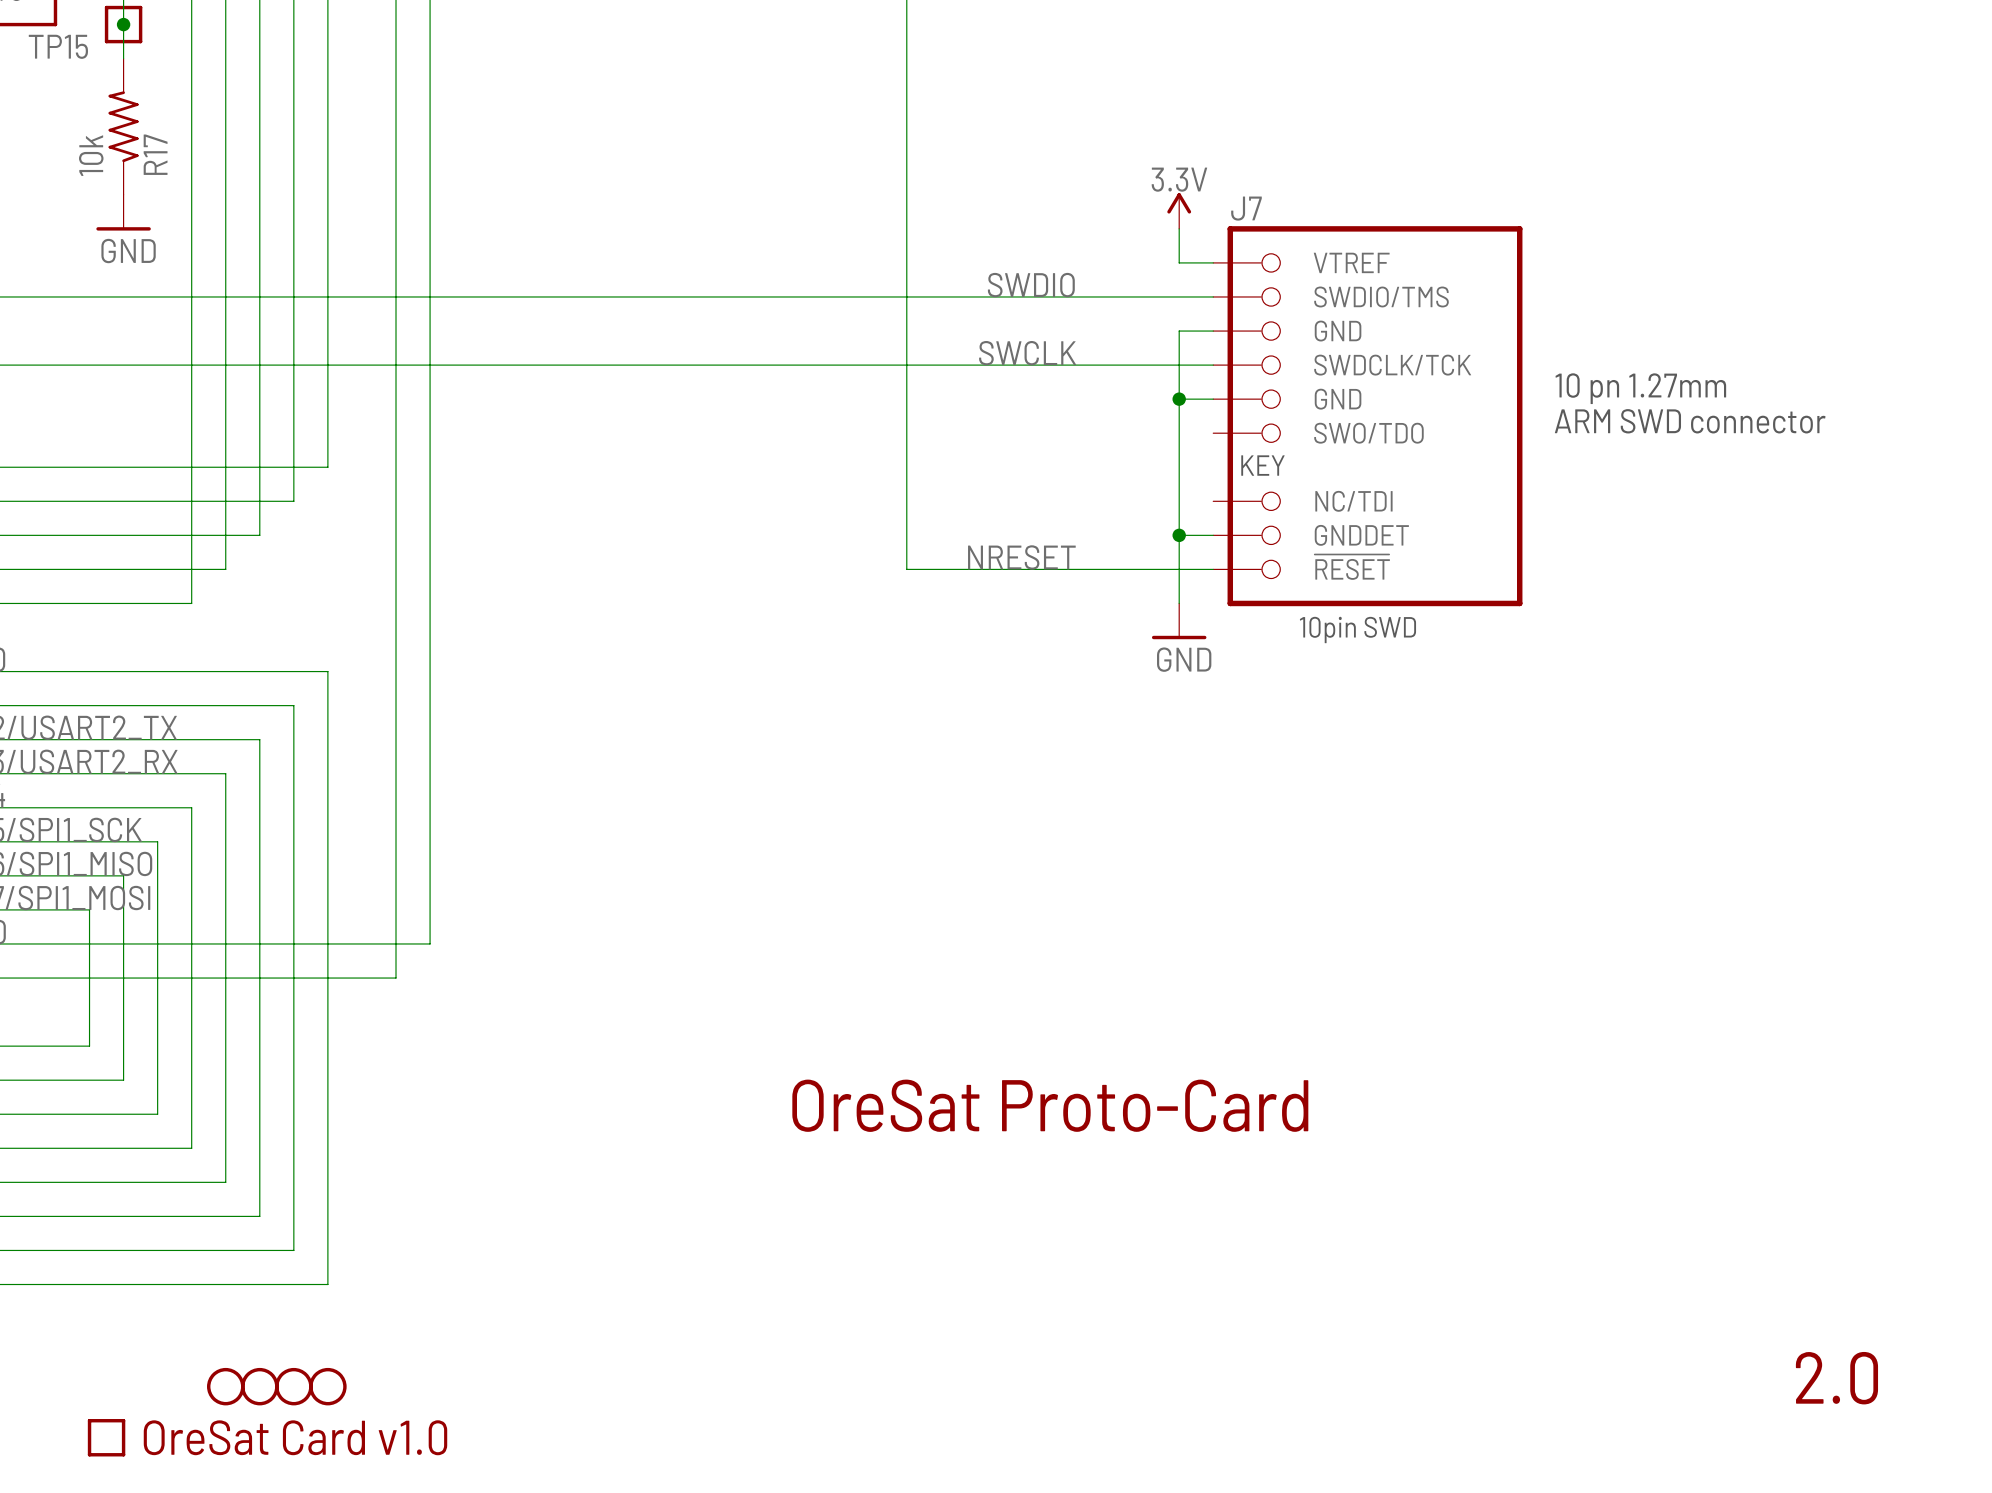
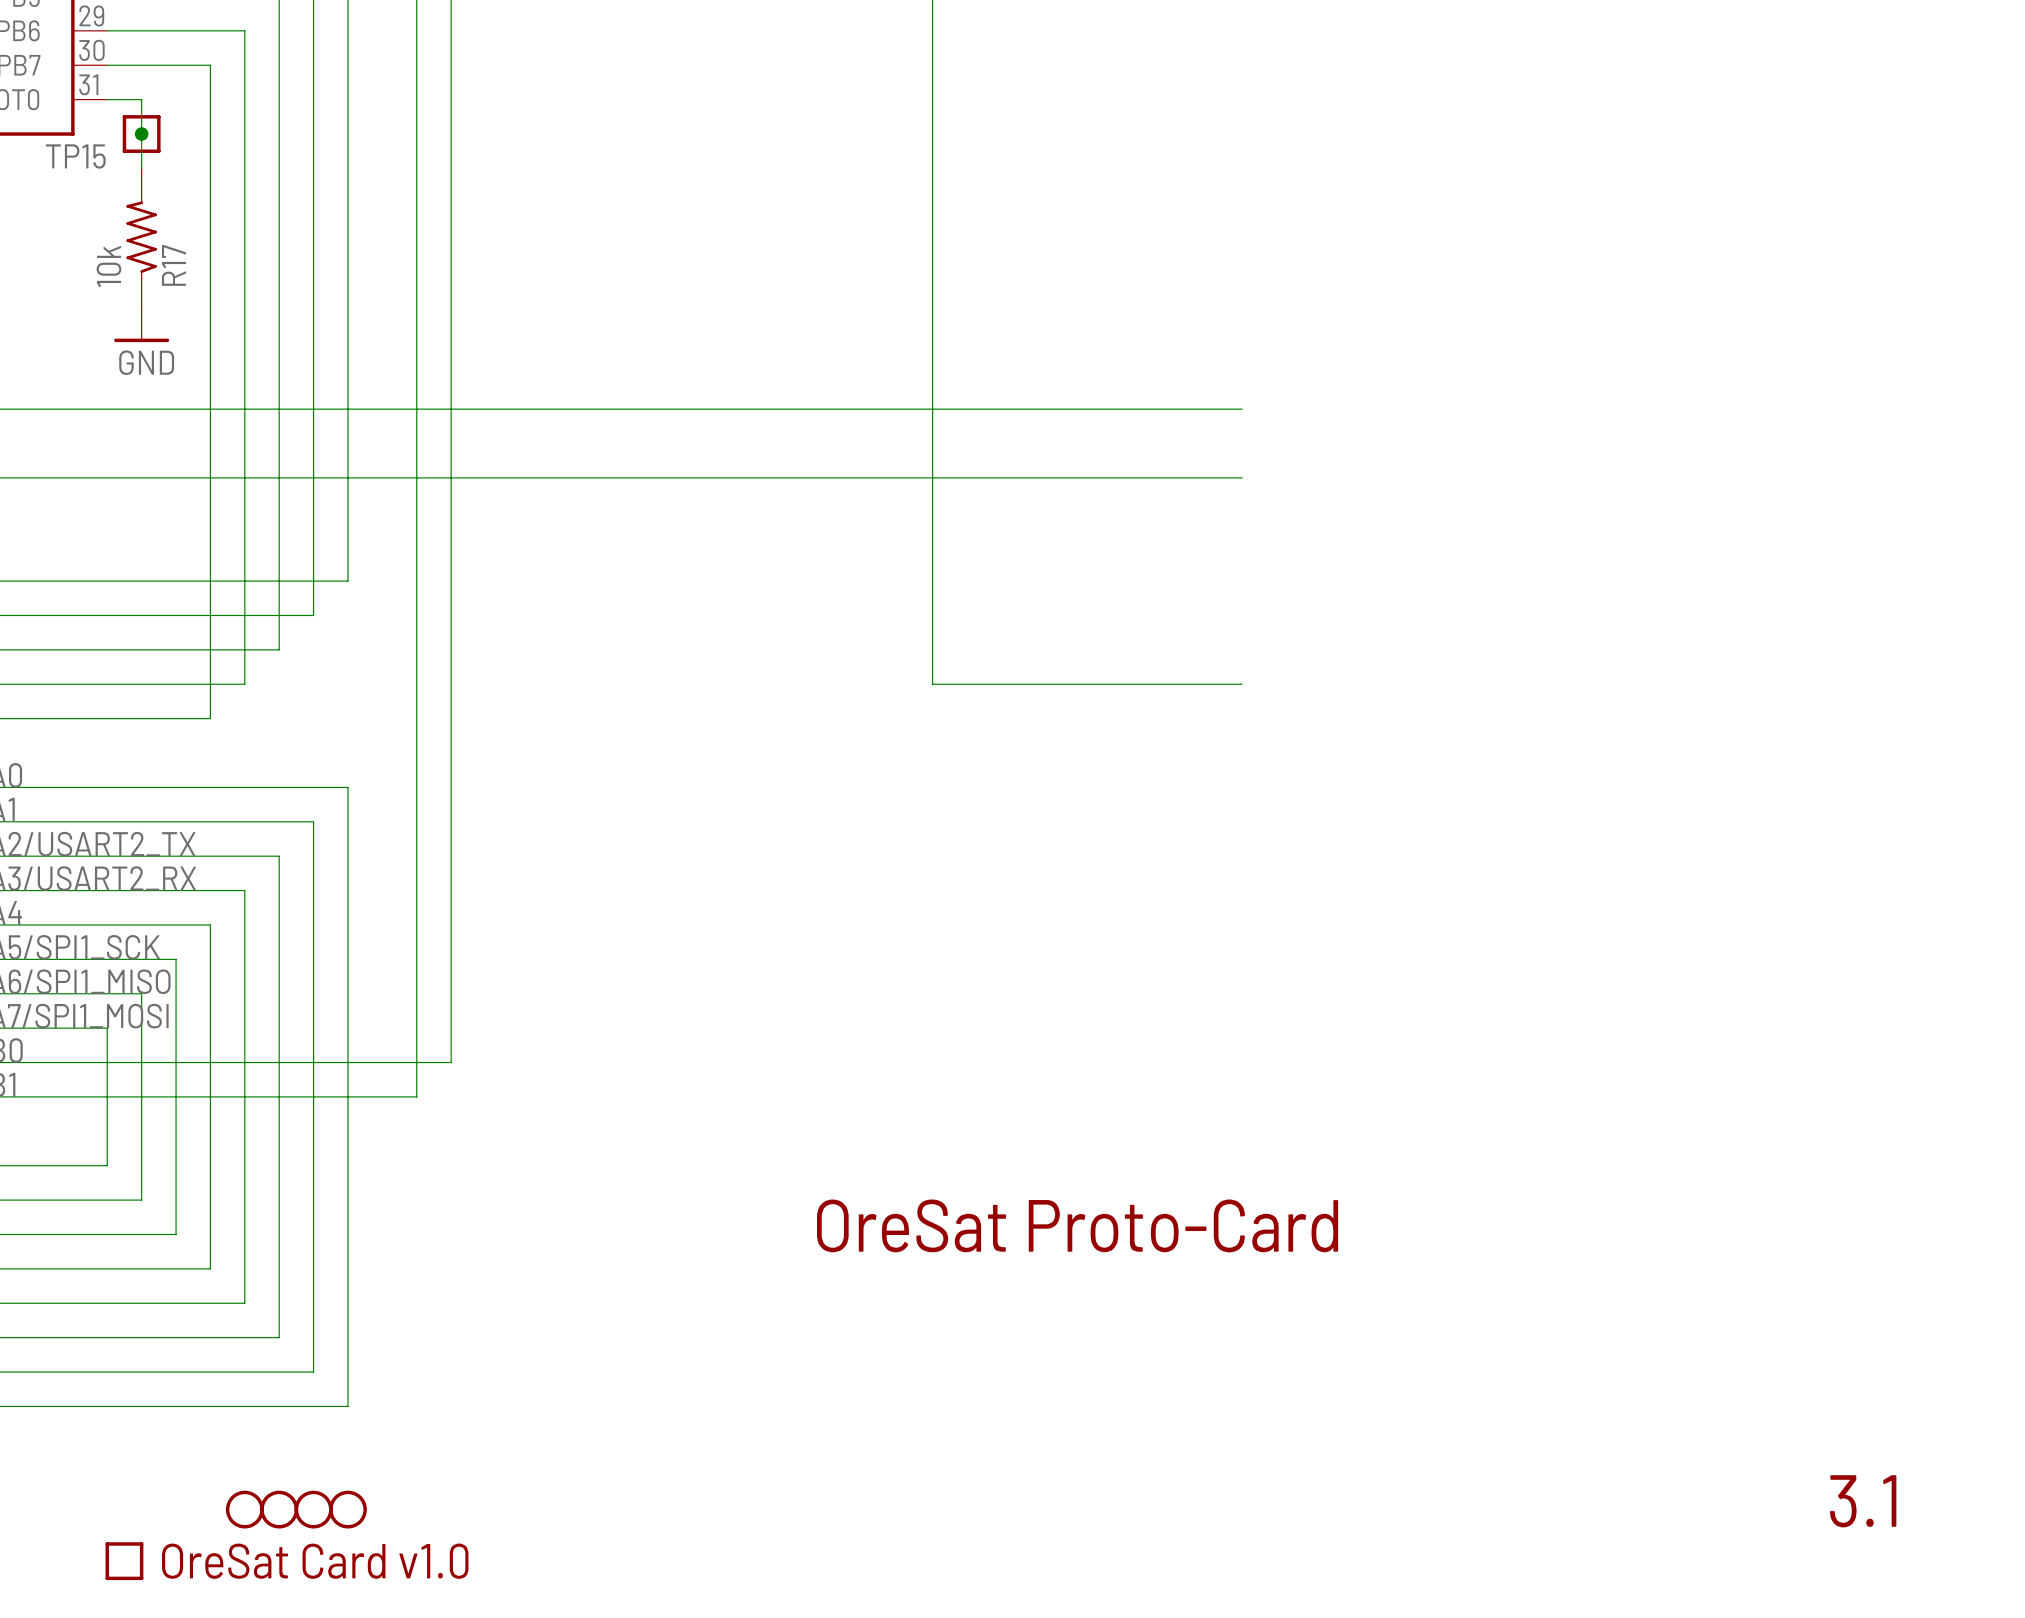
power symbol: 3.3V (1179, 211) -> none
wire: (1179, 228) (1179, 262) (1213, 262) -> none
label: SWDIO (1031, 285) -> none
wire: (1213, 331) (1179, 331) (1179, 603) -> none
label: SWCLK (1027, 353) -> none
text: 10 pn 1.27mm (1640, 388) -> none
wire: (1179, 399) (1213, 399) -> none
junction: (1179, 399) -> none
J7: (1367, 416) -> none
text: ARM SWD connector (1690, 421) -> none
wire: (1179, 535) (1213, 535) -> none
junction: (1179, 535) -> none
label: NRESET (1021, 557) -> none
power symbol: GND (1179, 621) -> none
text: 2.0 (1836, 1378) -> 3.1 (1863, 1501)

